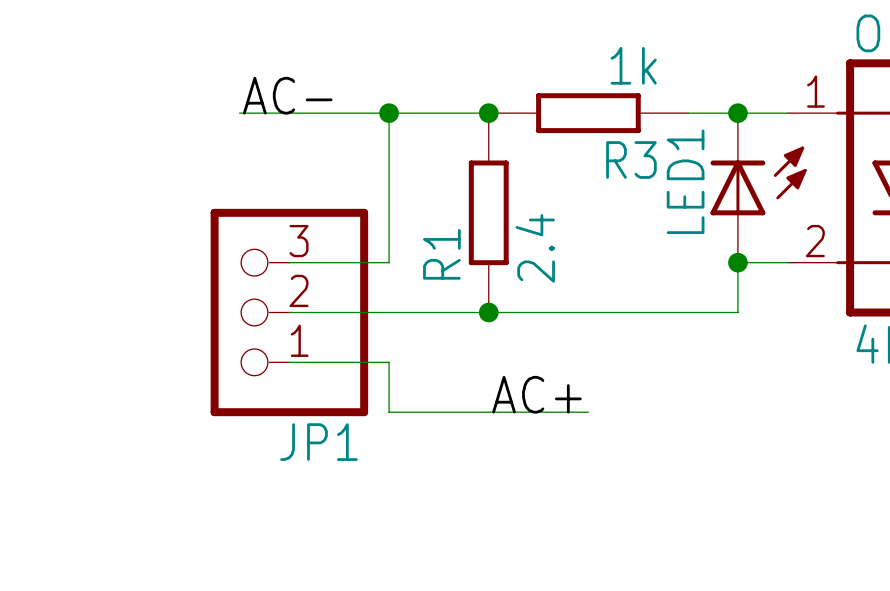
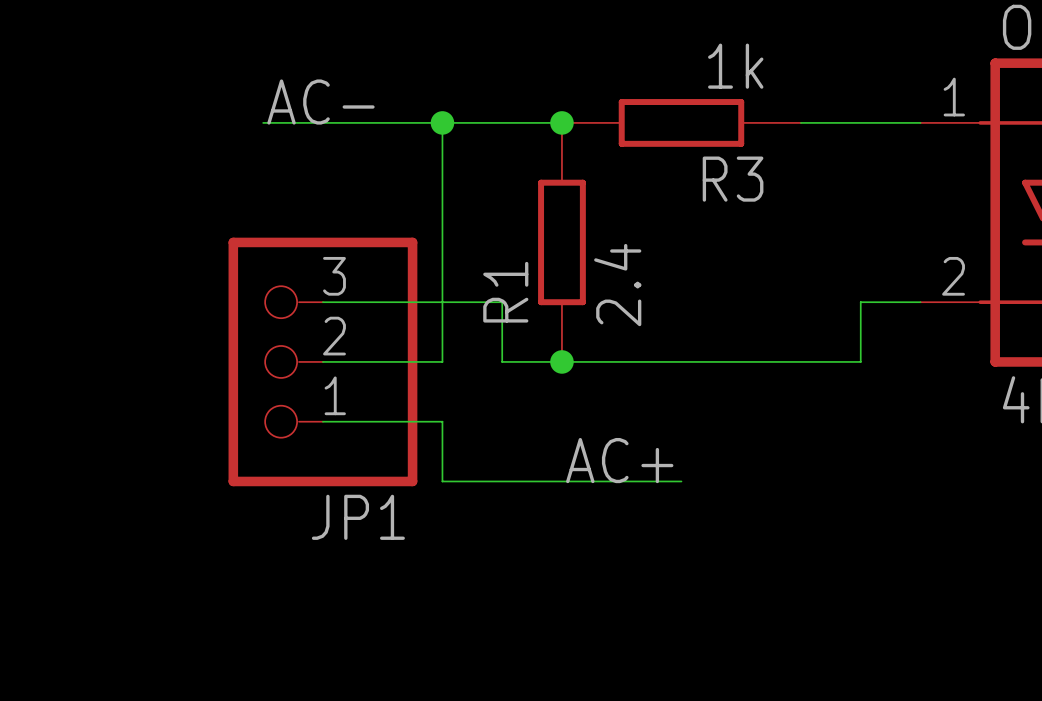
junction: (737, 113) -> none
LED1: (758, 187) -> none
junction: (737, 262) -> none
wire: (389, 312) (438, 312) -> (442, 361) (442, 302) (502, 302) (502, 361)

